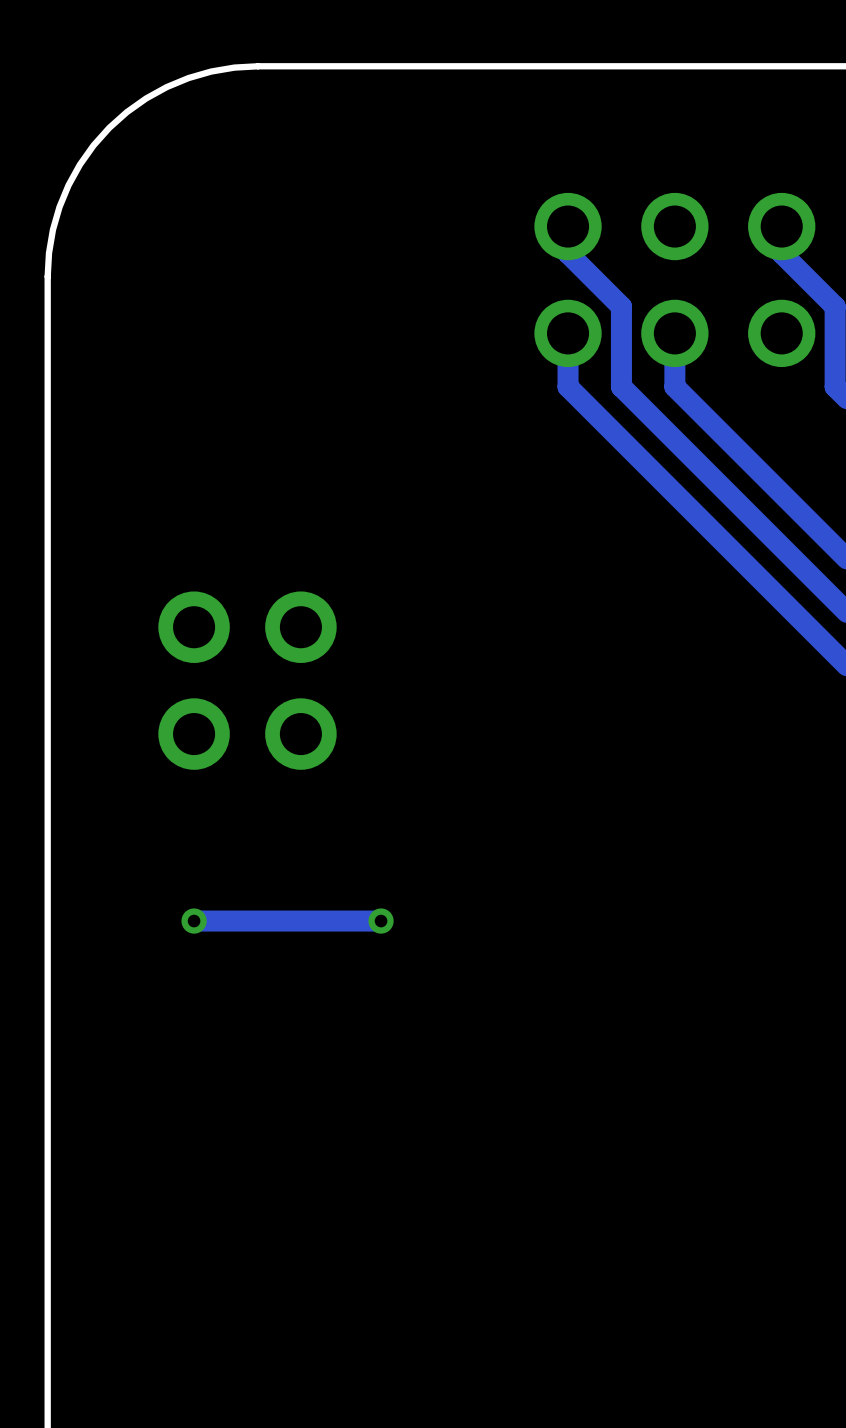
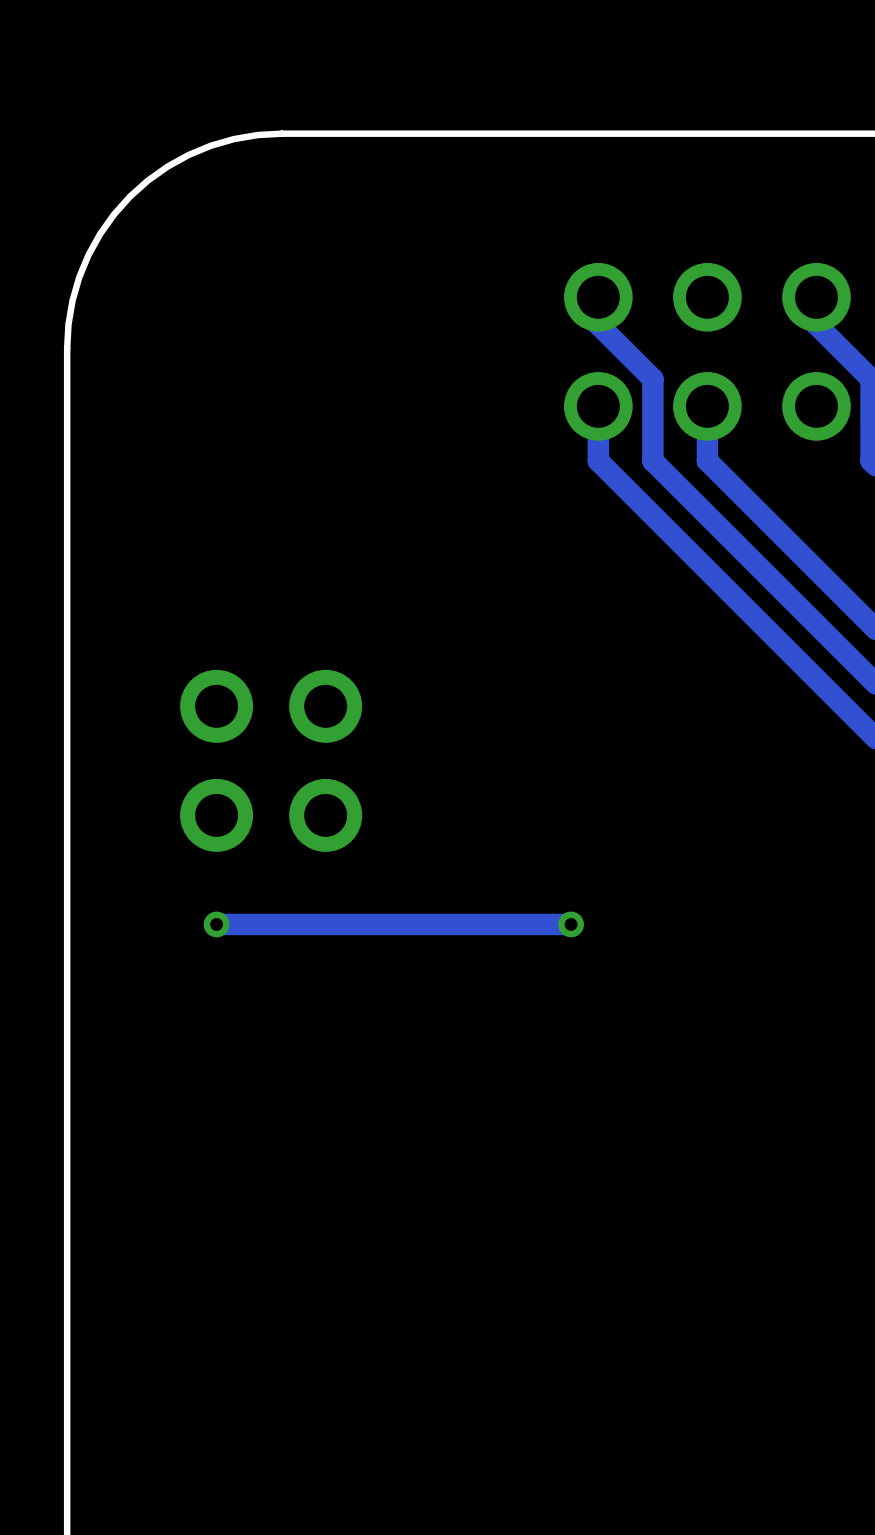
track: none -> (571, 924) (216, 924)
via: none -> (571, 924)
via position: (194, 921) -> (216, 924)
track: (381, 921) (194, 921) -> none
via: (381, 921) -> none

